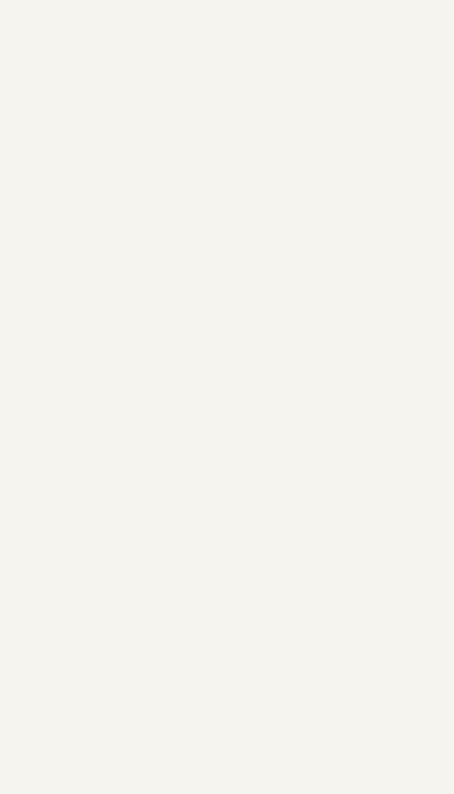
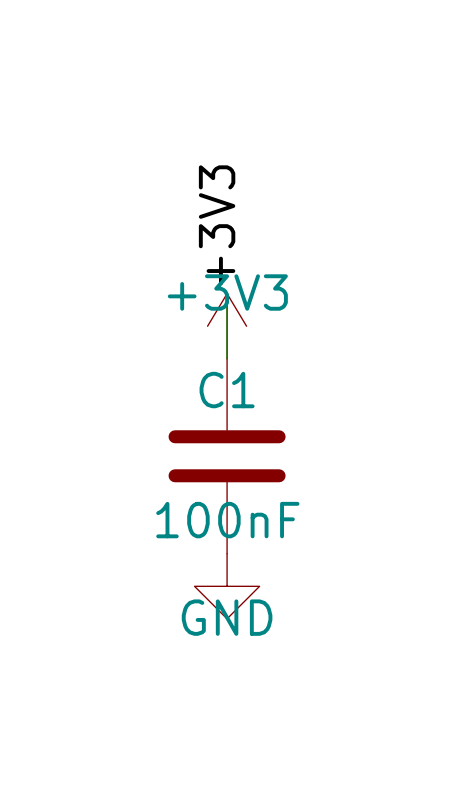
label: none -> +3V3 (217, 225)
wire: none -> (227, 293) (227, 358)
power symbol: none -> +3V3 (227, 326)
C1: none -> 100nF (227, 456)
power symbol: none -> GND (227, 586)

